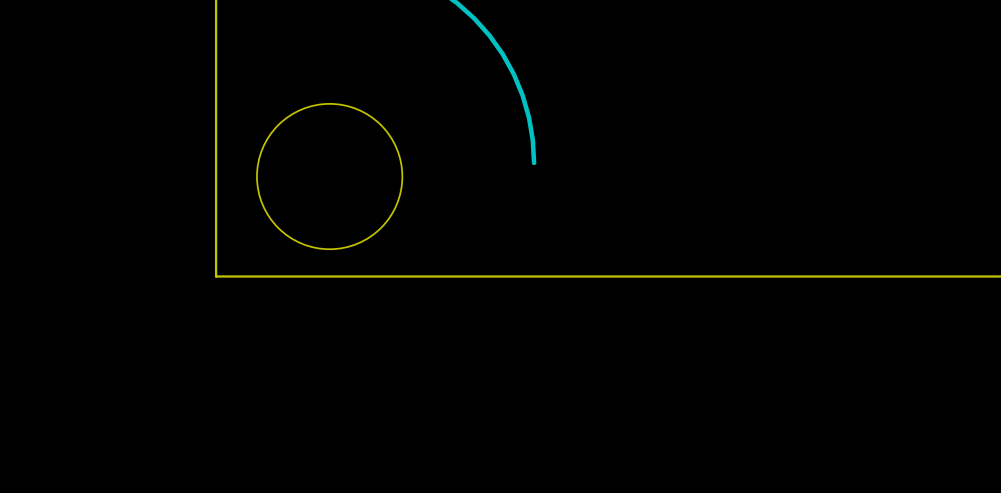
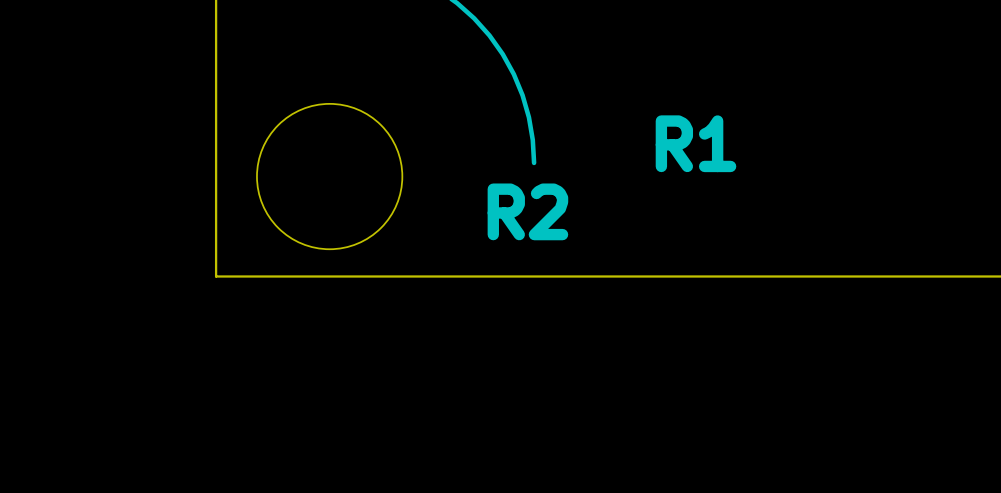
text: none -> R1 (695, 143)
text: none -> R2 (527, 211)

